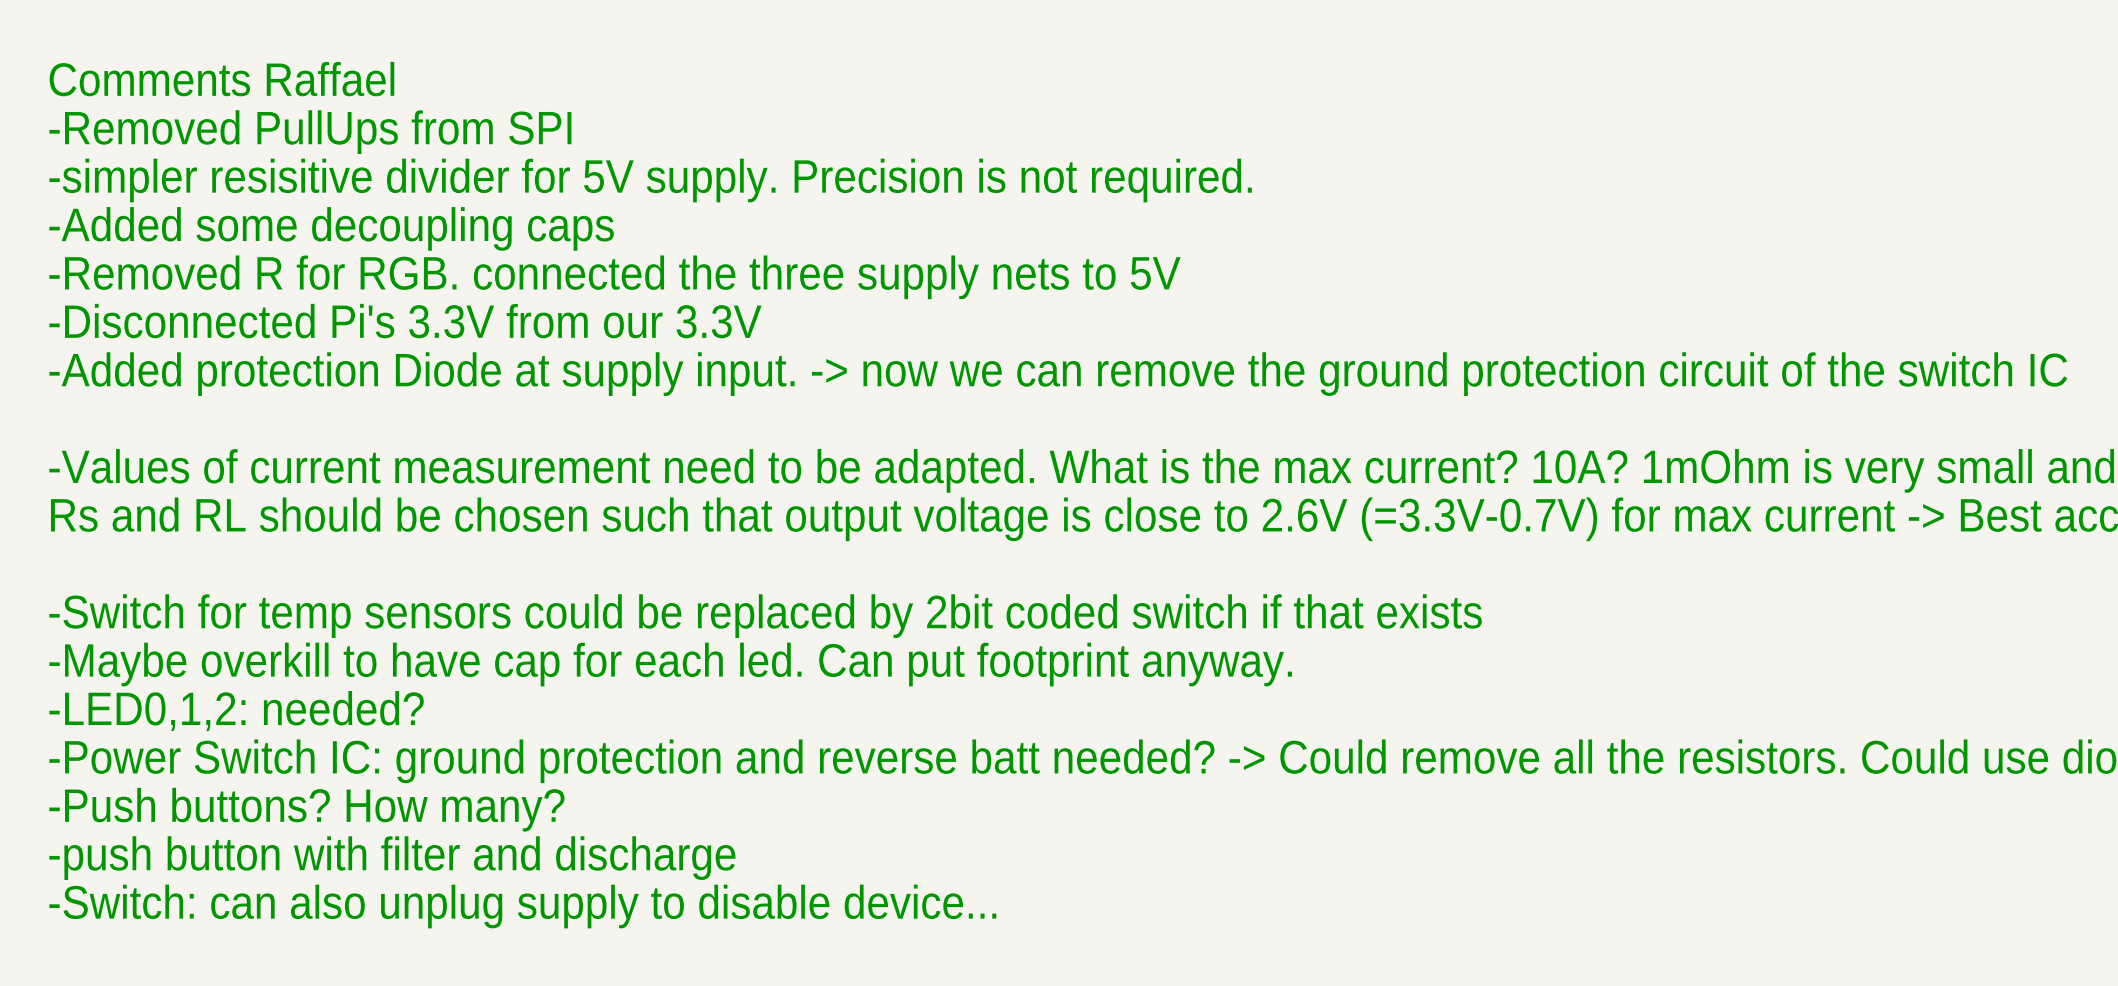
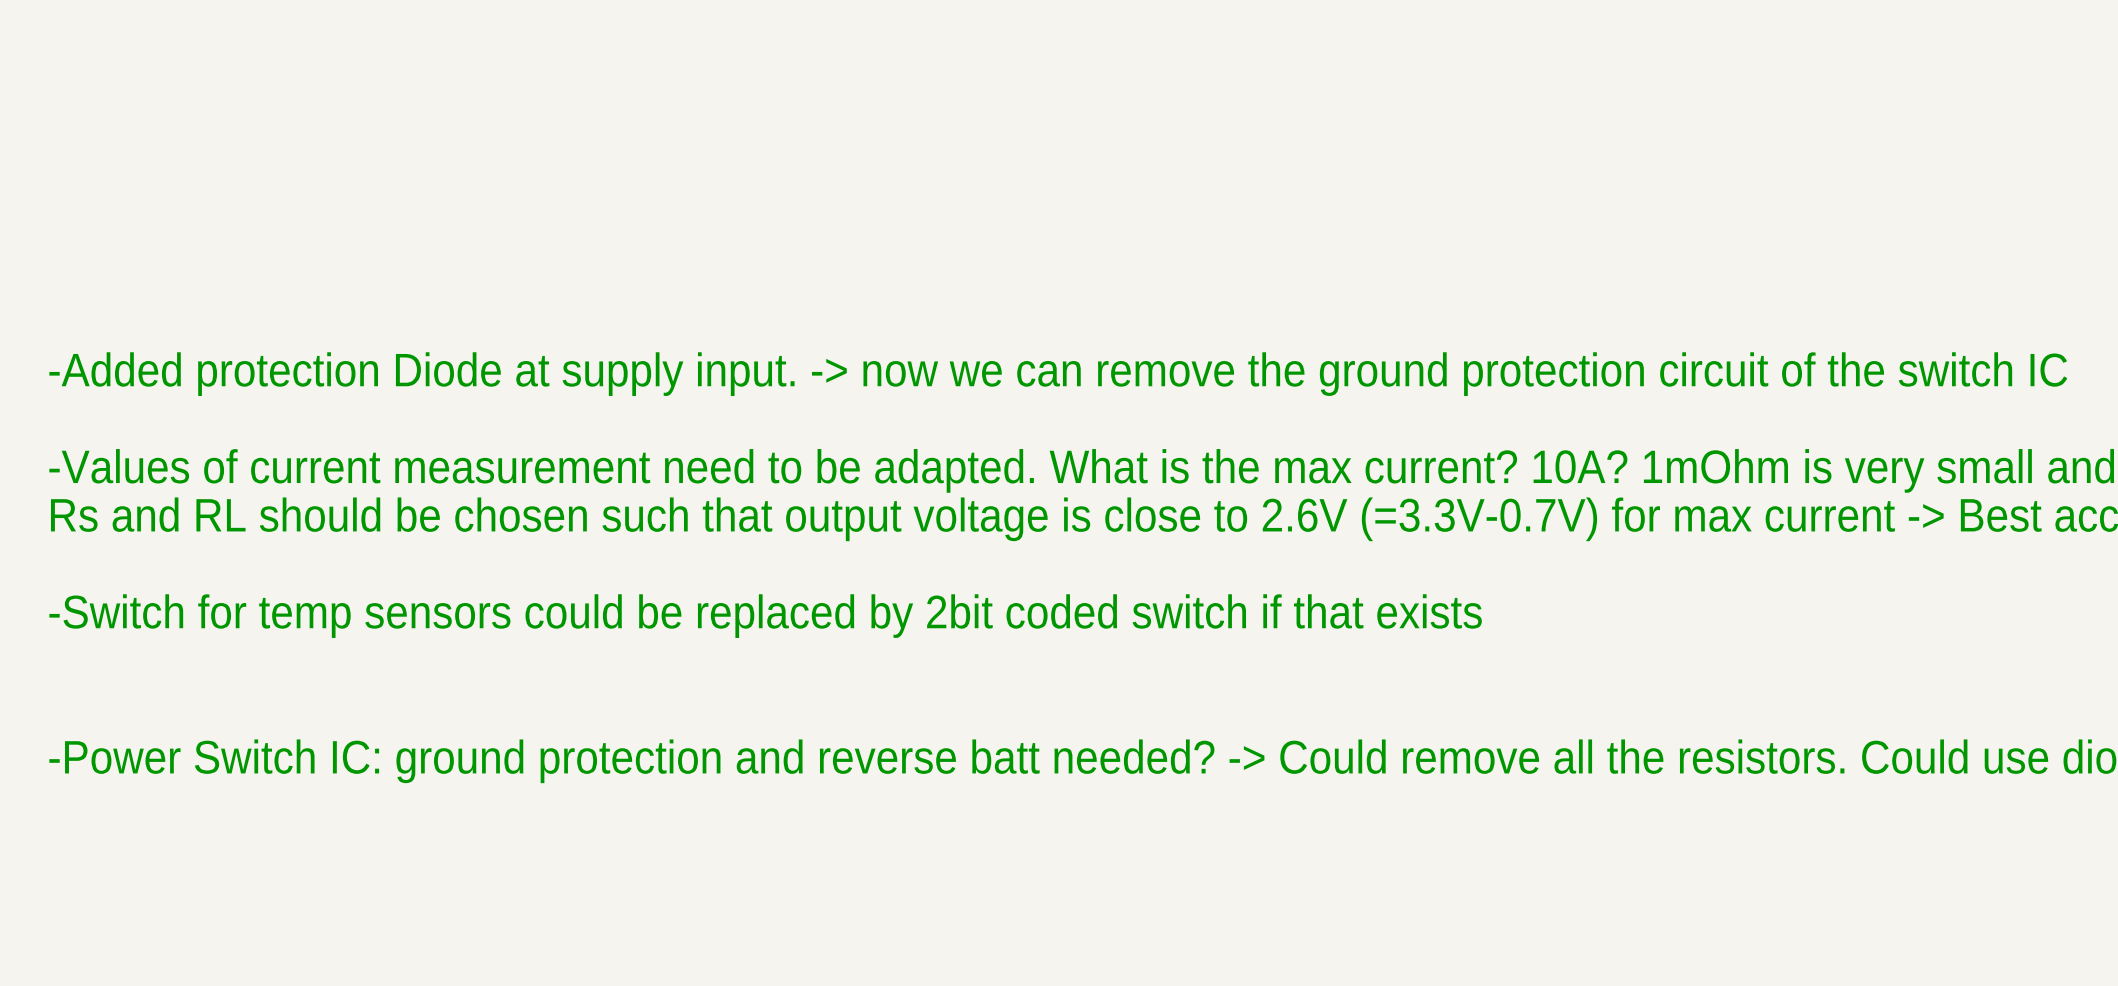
text: Comments Raffael (221, 79) -> none
text: -Removed PullUps from SPI (310, 132) -> none
text: -simpler resisitive divider for 5V supply. Precision is not required. (650, 180) -> none
text: -Added some decoupling caps (331, 228) -> none
text: -Removed R for RGB. connected the three supply nets to 5V (614, 277) -> none
text: -Disconnected Pi's 3.3V from our 3.3V (405, 321) -> none
text: -Maybe overkill to have cap for each led. Can put footprint anyway. (670, 664) -> none
text: -LED0,1,2: needed? (236, 711) -> none
text: -Push buttons? How many? (306, 809) -> none
text: -push button with filter and discharge (392, 858) -> none
text: -Switch: can also unplug supply to disable device... (522, 906) -> none

